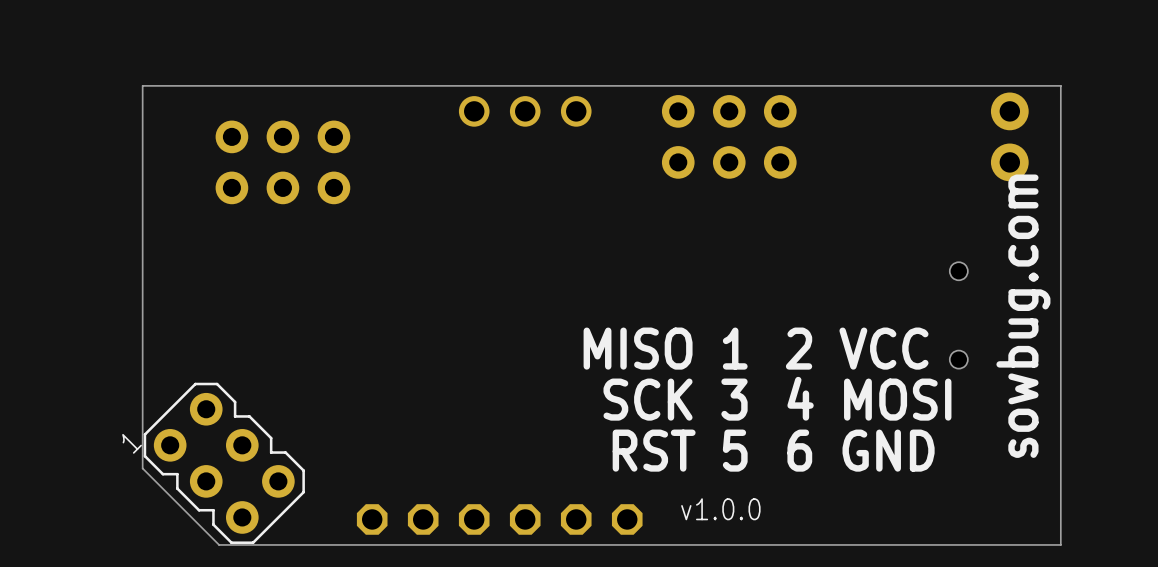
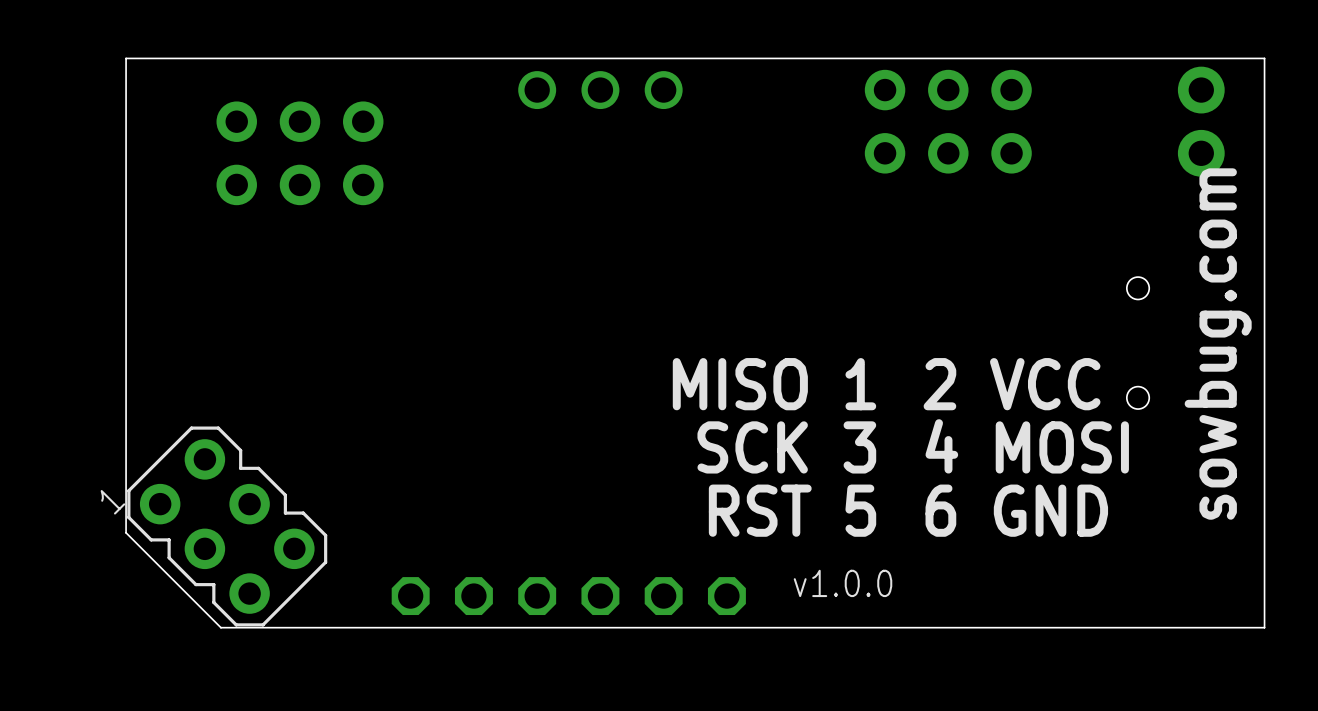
part position: (729, 136) -> (948, 121)

